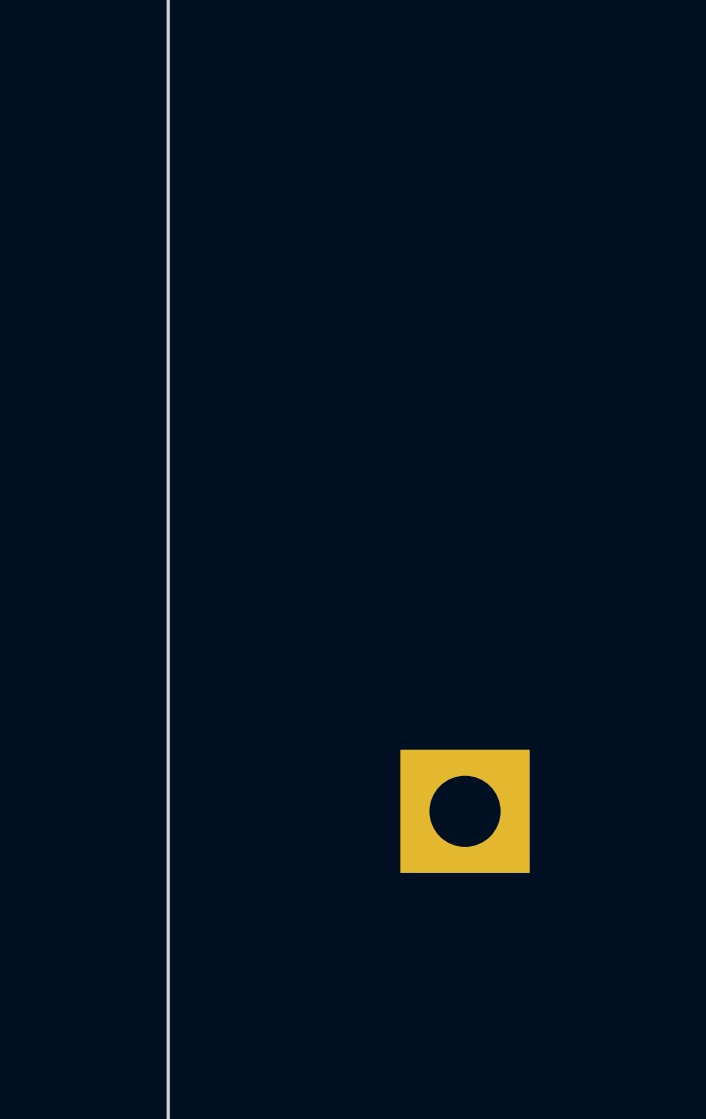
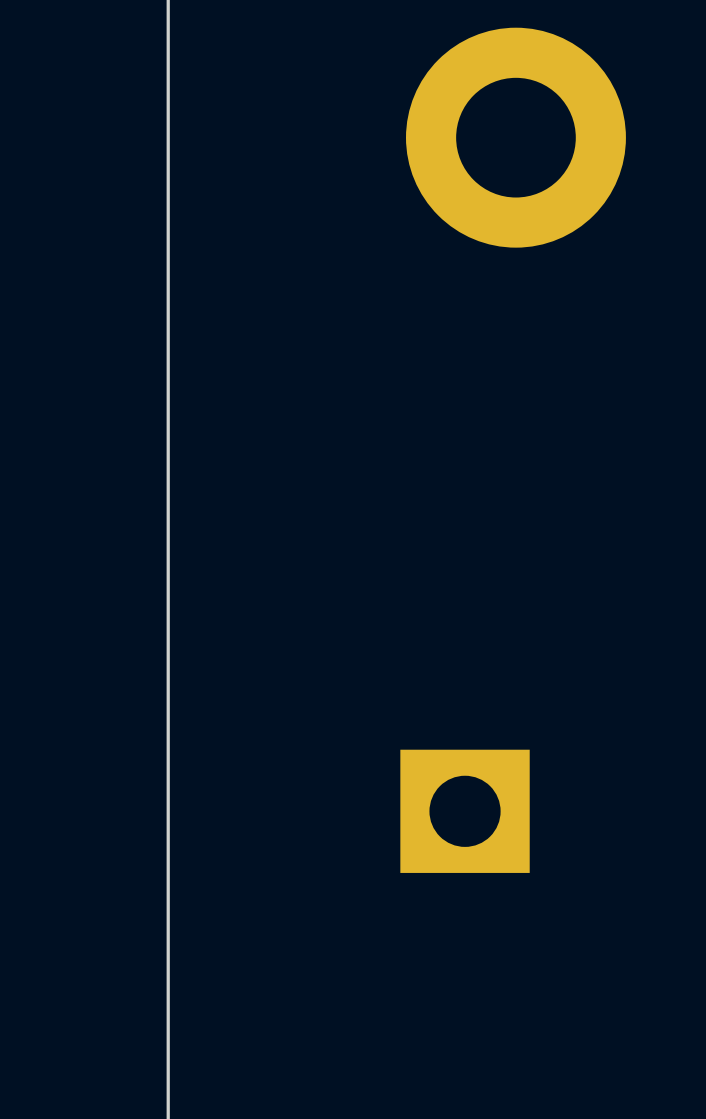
part: none -> (515, 137)

